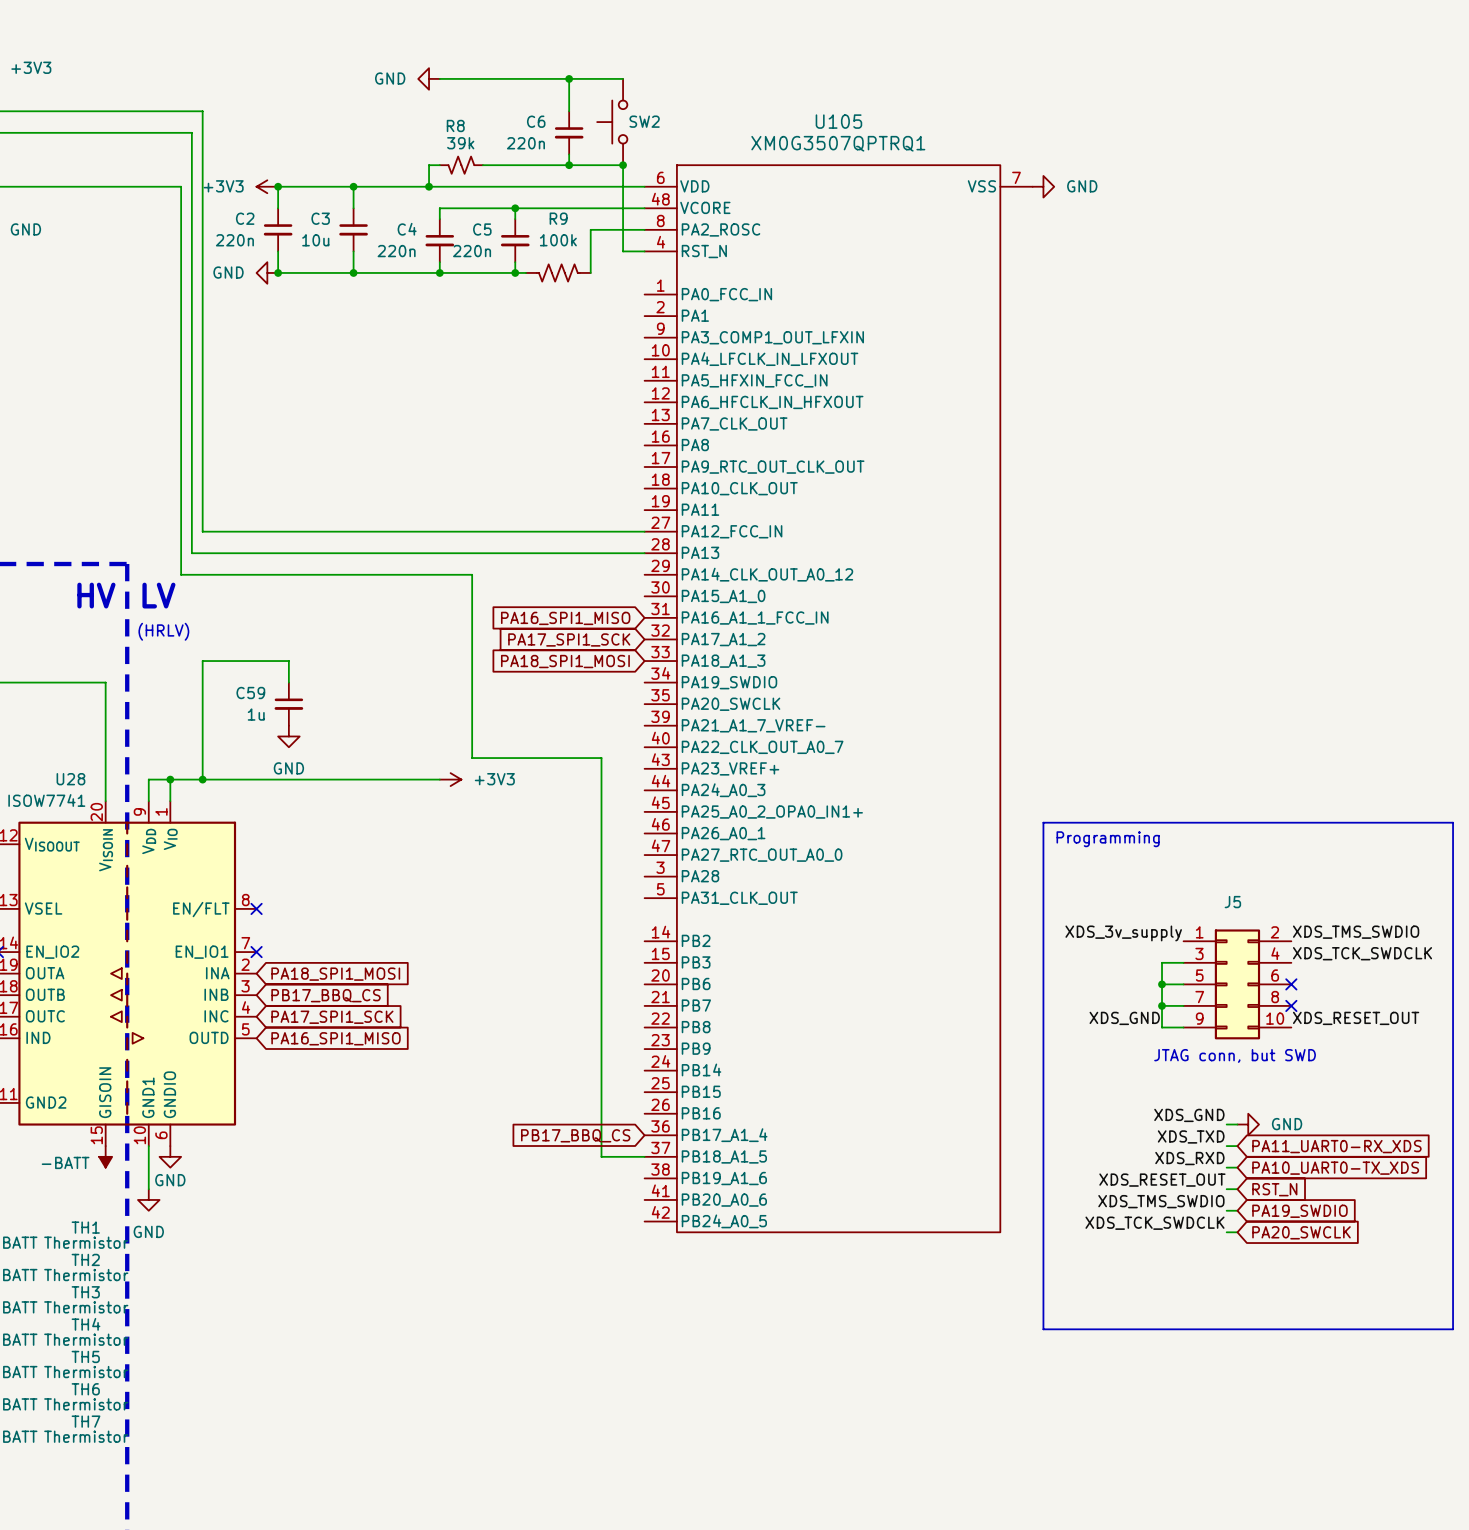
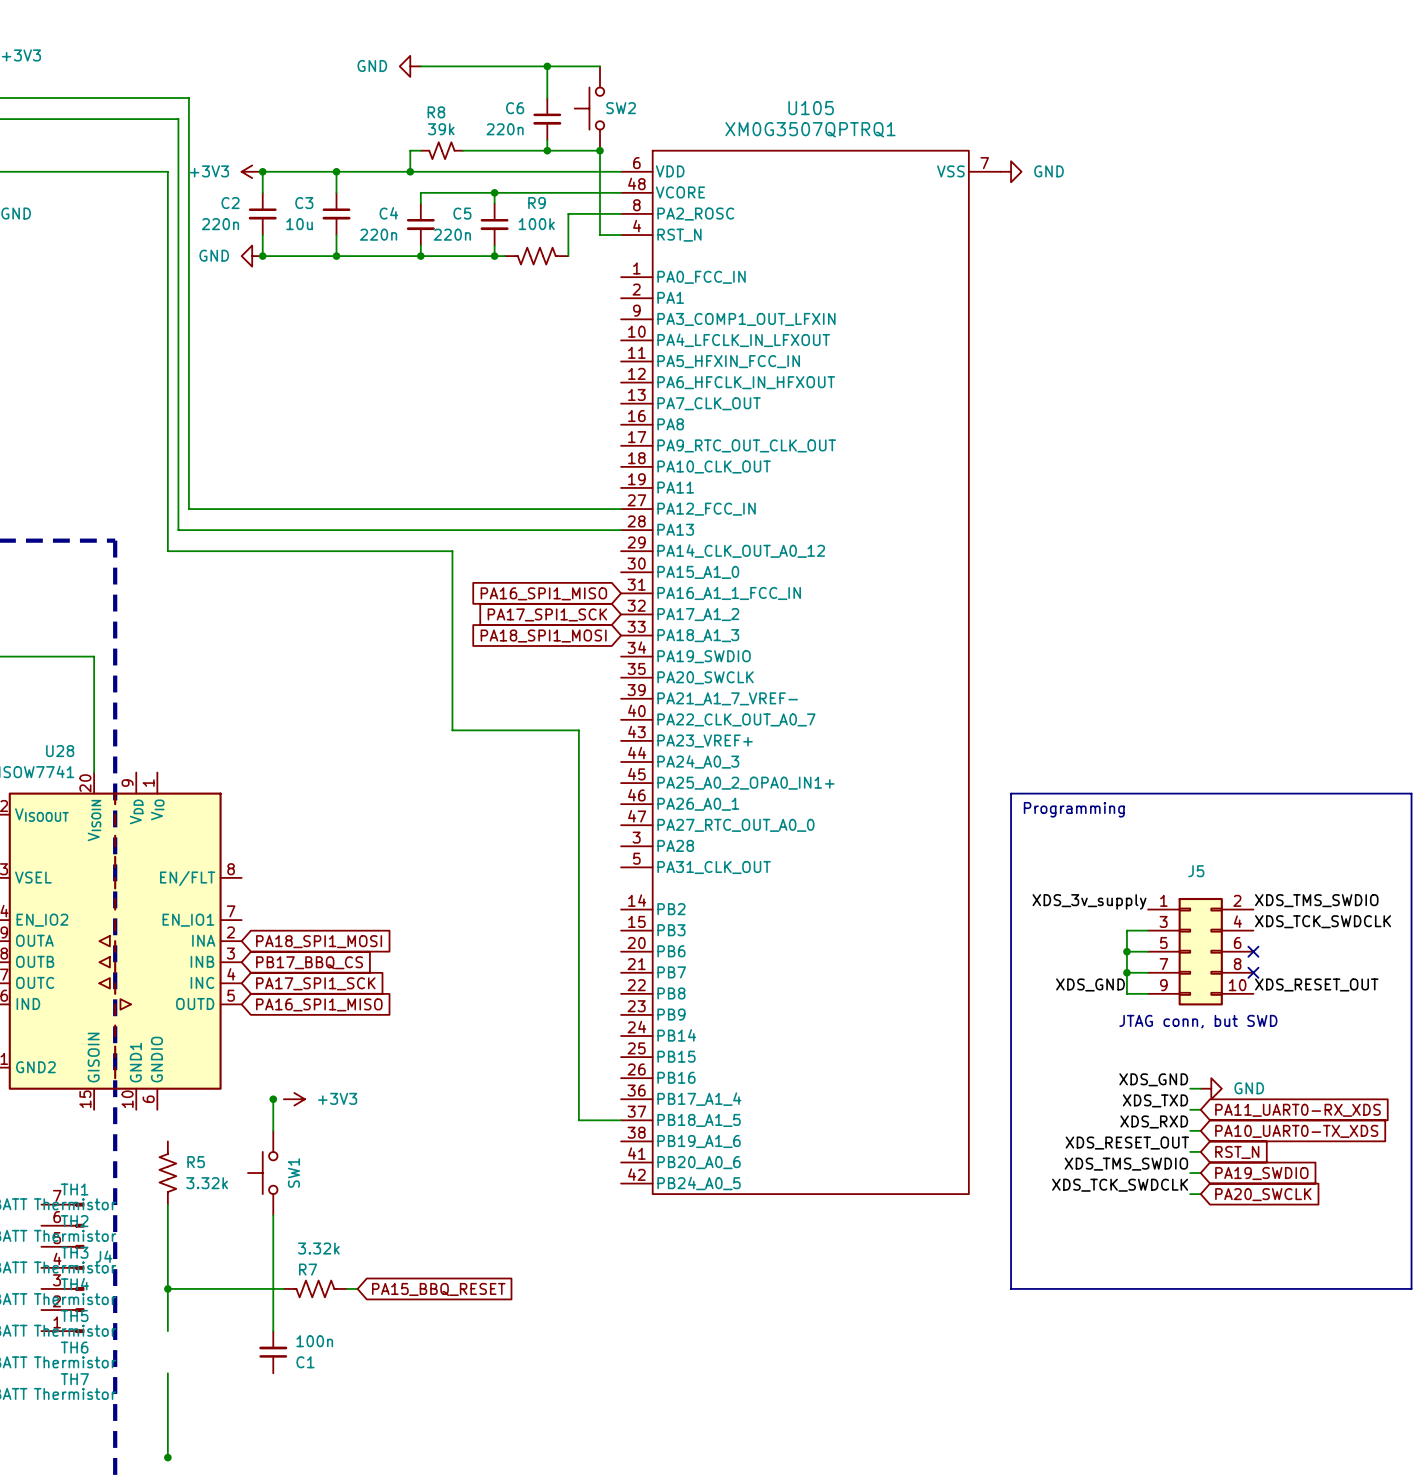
text: HV (96, 595) -> none
text: LV (158, 595) -> none
text: (HRLV) (163, 631) -> none
wire: (288, 682) (288, 661) (202, 661) (202, 779) -> none
C59: 1u (288, 704) -> none
power symbol: GND (288, 736) -> none
wire: (170, 779) (170, 801) -> none
junction: (170, 779) -> none
junction: (202, 779) -> none
wire: (439, 779) (148, 779) (148, 801) -> none
power symbol: +3V3 (450, 779) -> none
no-connect mark: (256, 908) -> none
no-connect mark: (256, 952) -> none
wire: none -> (273, 1099) (273, 1130)
junction: none -> (273, 1099)
power symbol: none -> +3V3 (294, 1099)
global label: PB17_BBQ_CS (575, 1135) -> none
wire: (148, 1146) (148, 1189) -> none
power symbol: -BATT (105, 1156) -> none
power symbol: GND (170, 1156) -> none
power symbol: GND (148, 1199) -> none
R5: none -> 3.32k (167, 1173)
SW1: none -> (262, 1173)
wire: none -> (167, 1204) (167, 1331)
wire: none -> (273, 1215) (273, 1331)
J4: none -> (62, 1267)
wire: none -> (167, 1288) (283, 1288)
junction: none -> (167, 1288)
R7: none -> 3.32k (315, 1288)
wire: none -> (347, 1288) (357, 1288)
global label: none -> PA15_BBQ_RESET (438, 1289)
C1: none -> 100n (273, 1352)
wire: none -> (167, 1373) (167, 1457)
junction: none -> (167, 1457)

